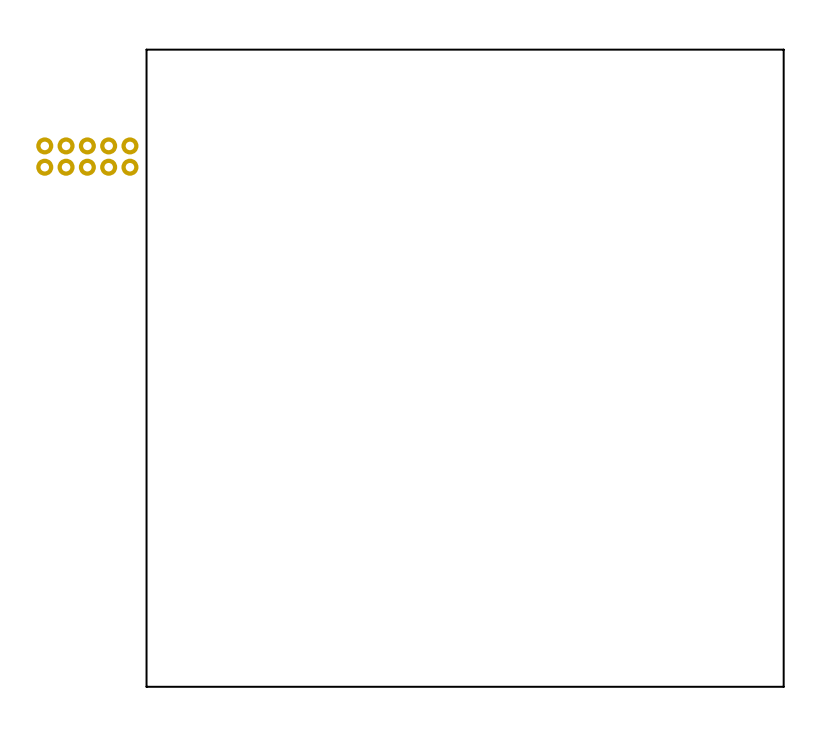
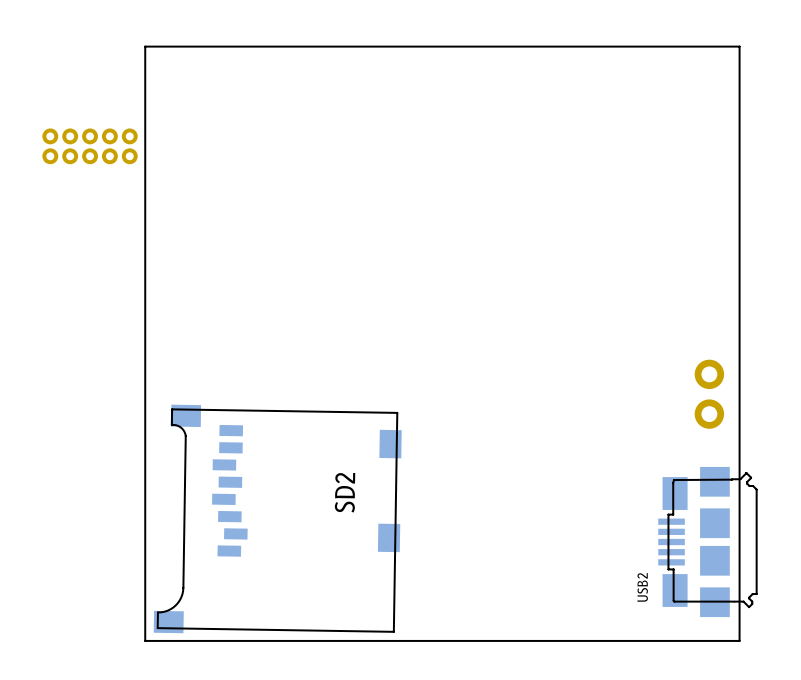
part: none -> (709, 394)
SD2: none -> (277, 518)
USB2: none -> (707, 542)

